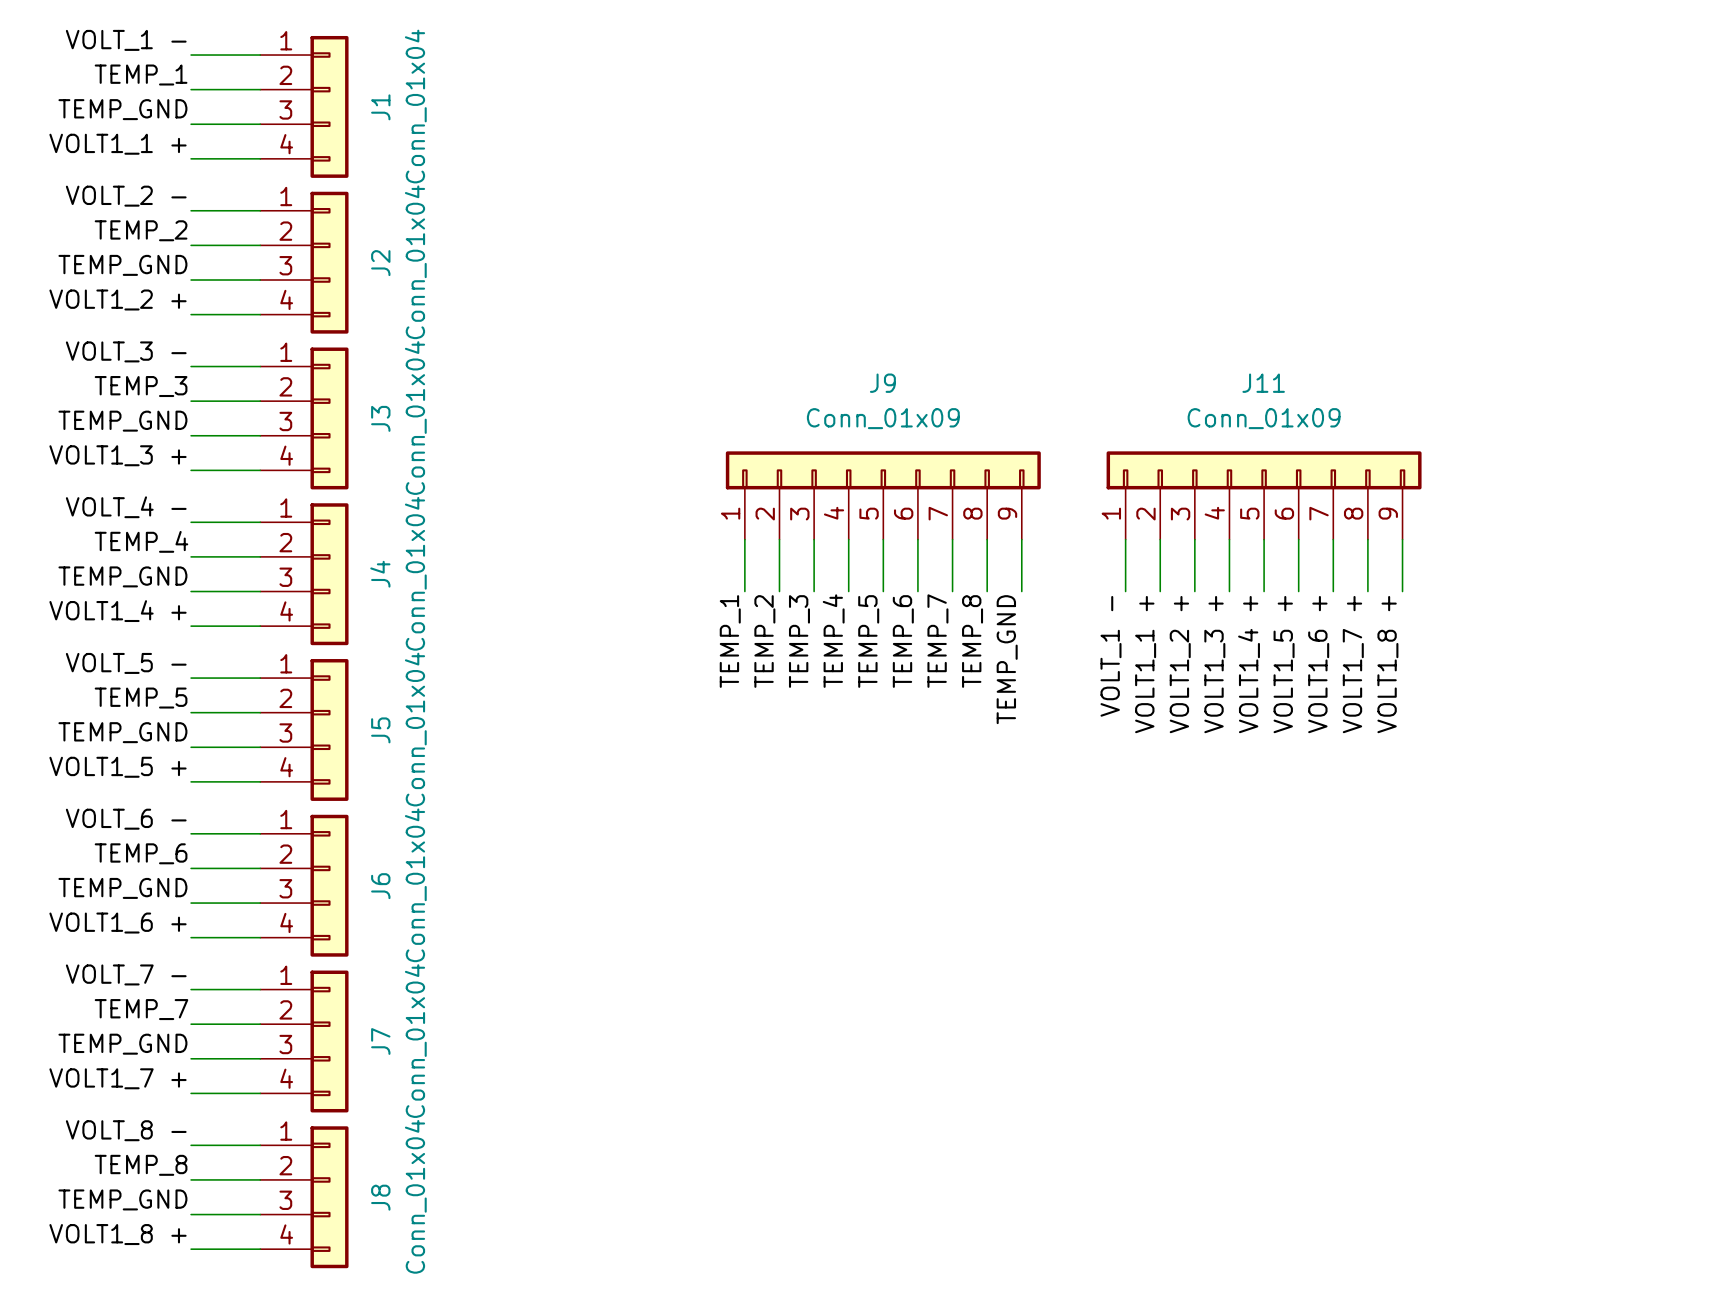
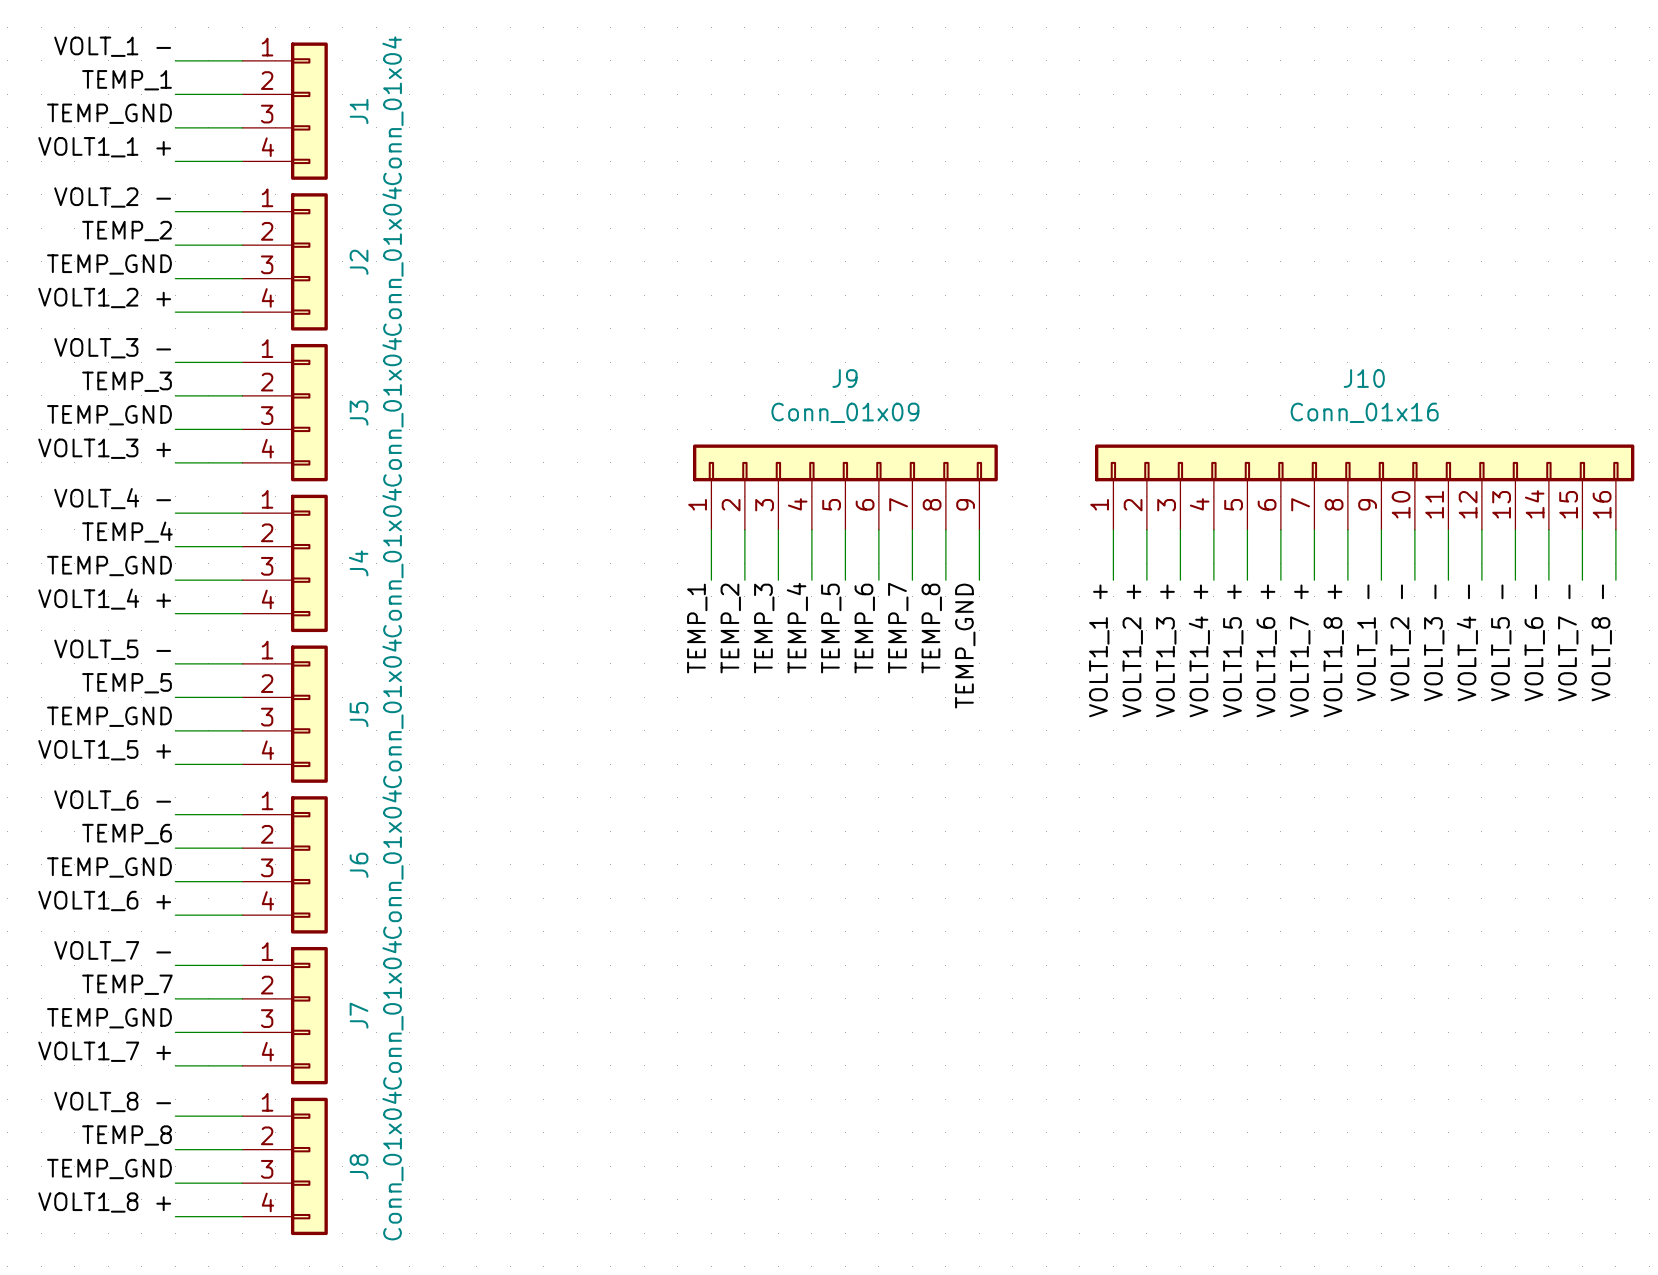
J11: Conn_01x09 (1264, 495) -> none
J10: none -> Conn_01x16 (1364, 487)
wire: (1125, 539) (1125, 591) -> (1381, 529) (1381, 580)
wire: none -> (1414, 529) (1414, 580)
wire: none -> (1448, 529) (1448, 580)
wire: none -> (1481, 529) (1481, 580)
wire: none -> (1515, 529) (1515, 580)
wire: none -> (1548, 529) (1548, 580)
wire: none -> (1582, 529) (1582, 580)
wire: none -> (1615, 529) (1615, 580)
label position: VOLT_1 - (1111, 656) -> VOLT_1 - (1367, 642)
label: none -> VOLT_2 - (1400, 642)
label: none -> VOLT_3 - (1434, 642)
label: none -> VOLT_4 - (1467, 642)
label: none -> VOLT_5 - (1501, 642)
label: none -> VOLT_6 - (1534, 642)
label: none -> VOLT_7 - (1568, 642)
label: none -> VOLT_8 - (1601, 642)

